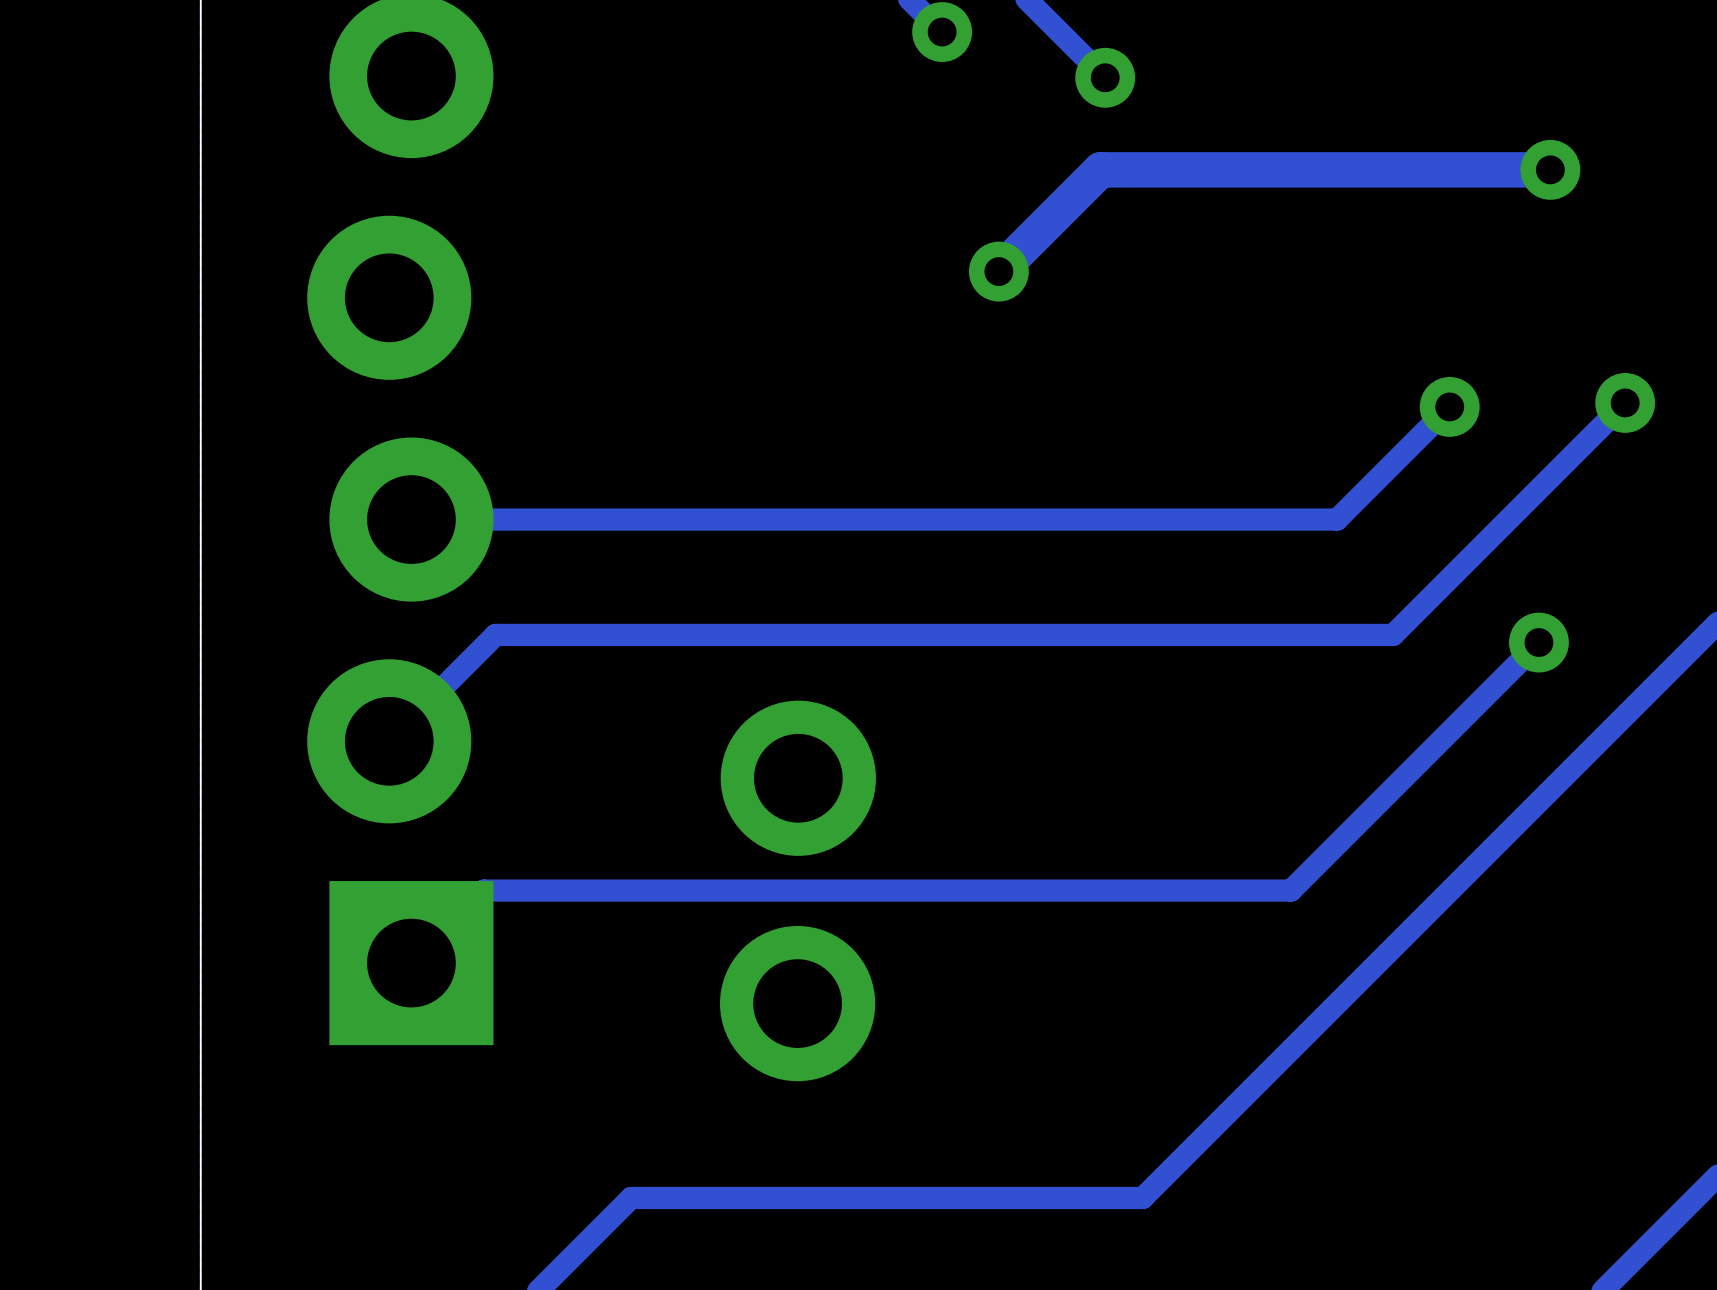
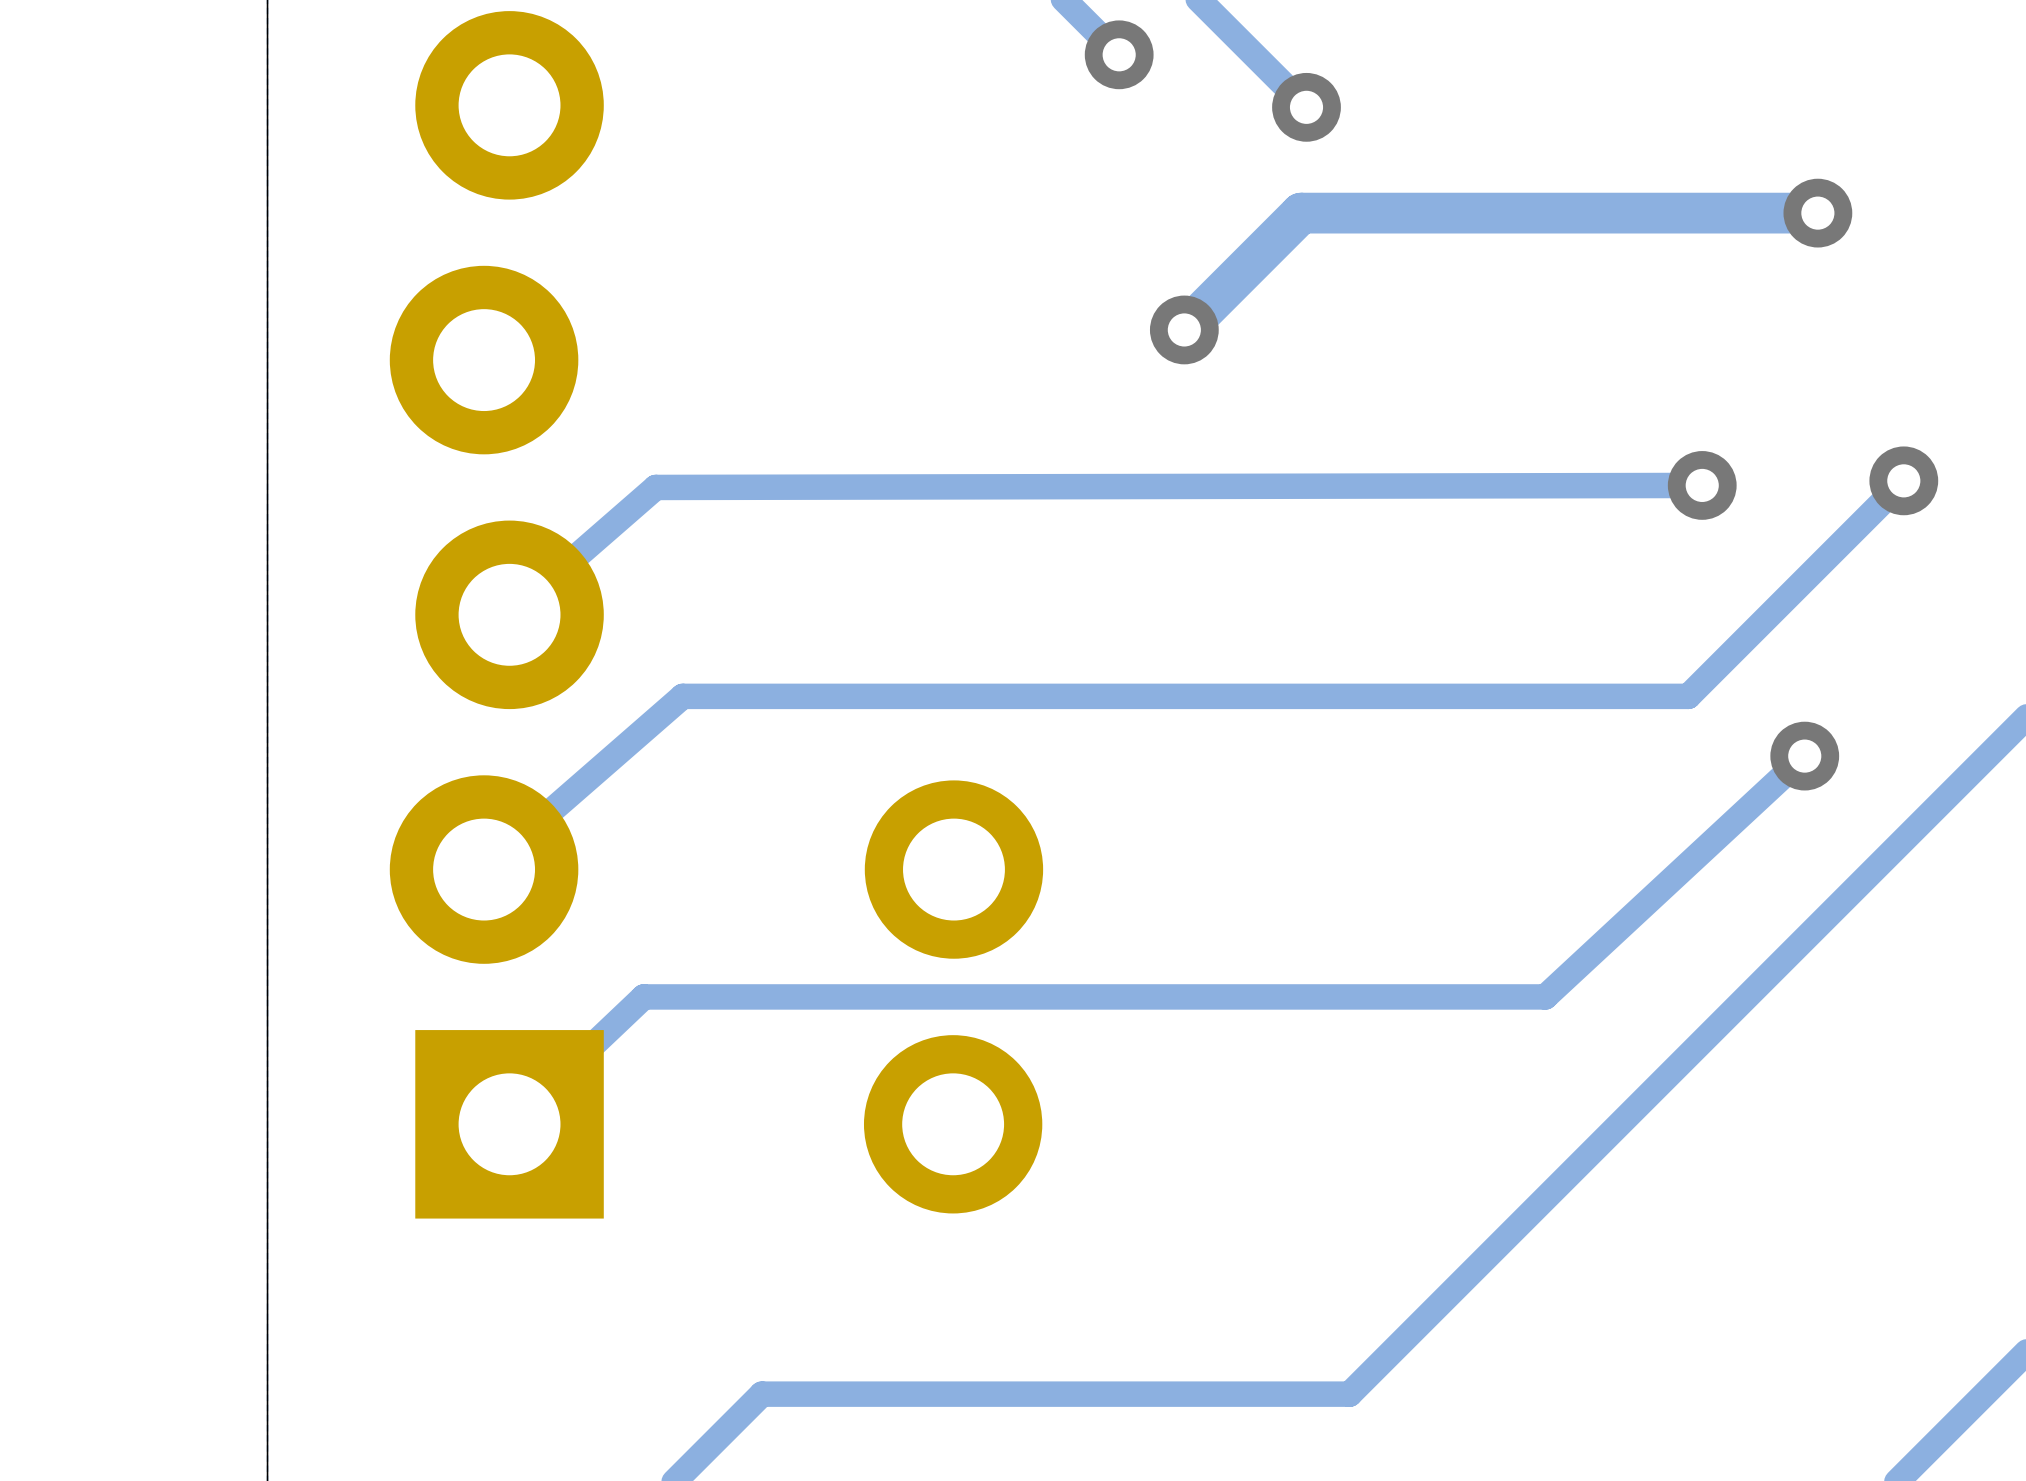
track: (1449, 406) (1337, 519) (411, 519) -> (1702, 485) (655, 487) (509, 614)
track: (1437, 590) (1393, 634) (495, 634) (389, 741) -> (1688, 696) (682, 696) (484, 869)
track: (1538, 642) (1290, 890) (483, 890) (411, 963) -> (1804, 756) (1545, 996) (643, 996) (509, 1124)
part position: (798, 778) -> (953, 869)
part position: (797, 1003) -> (953, 1124)

